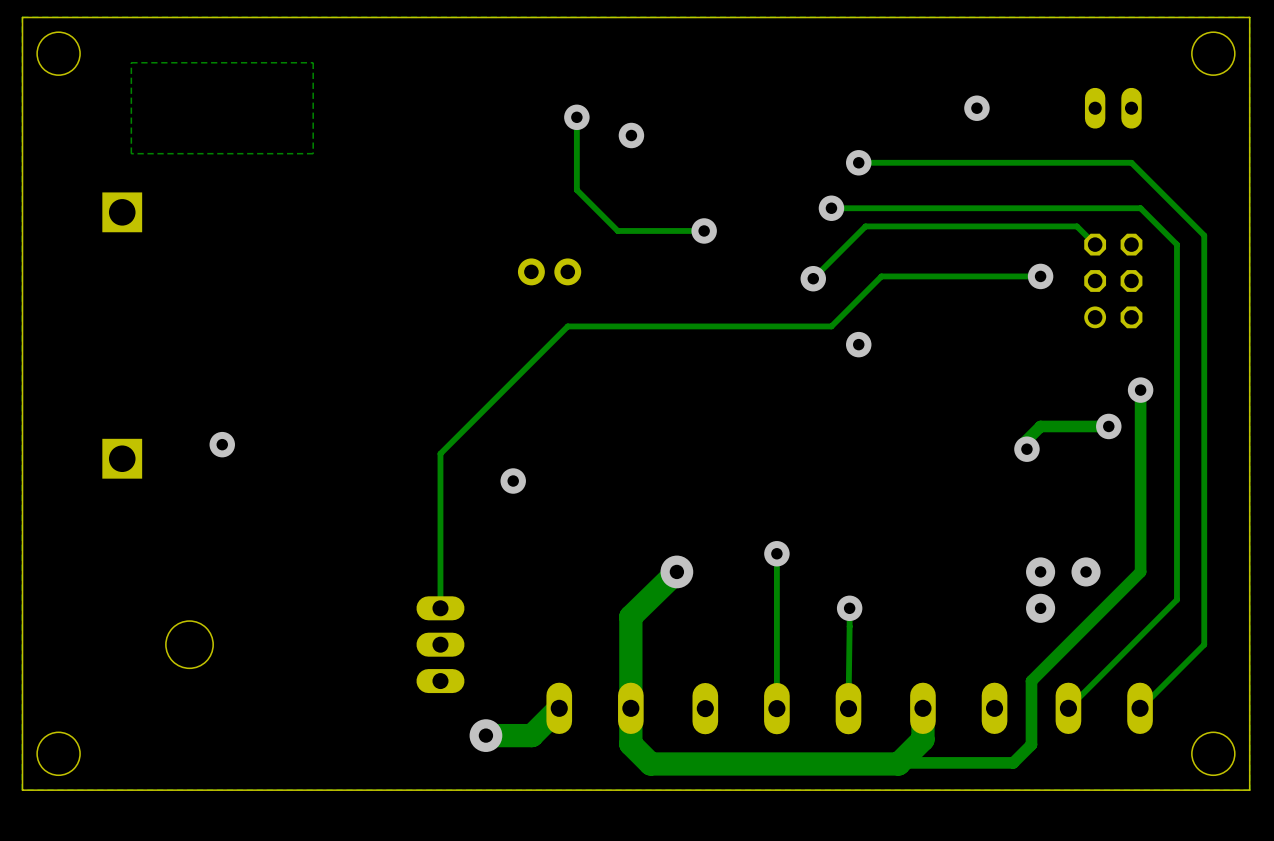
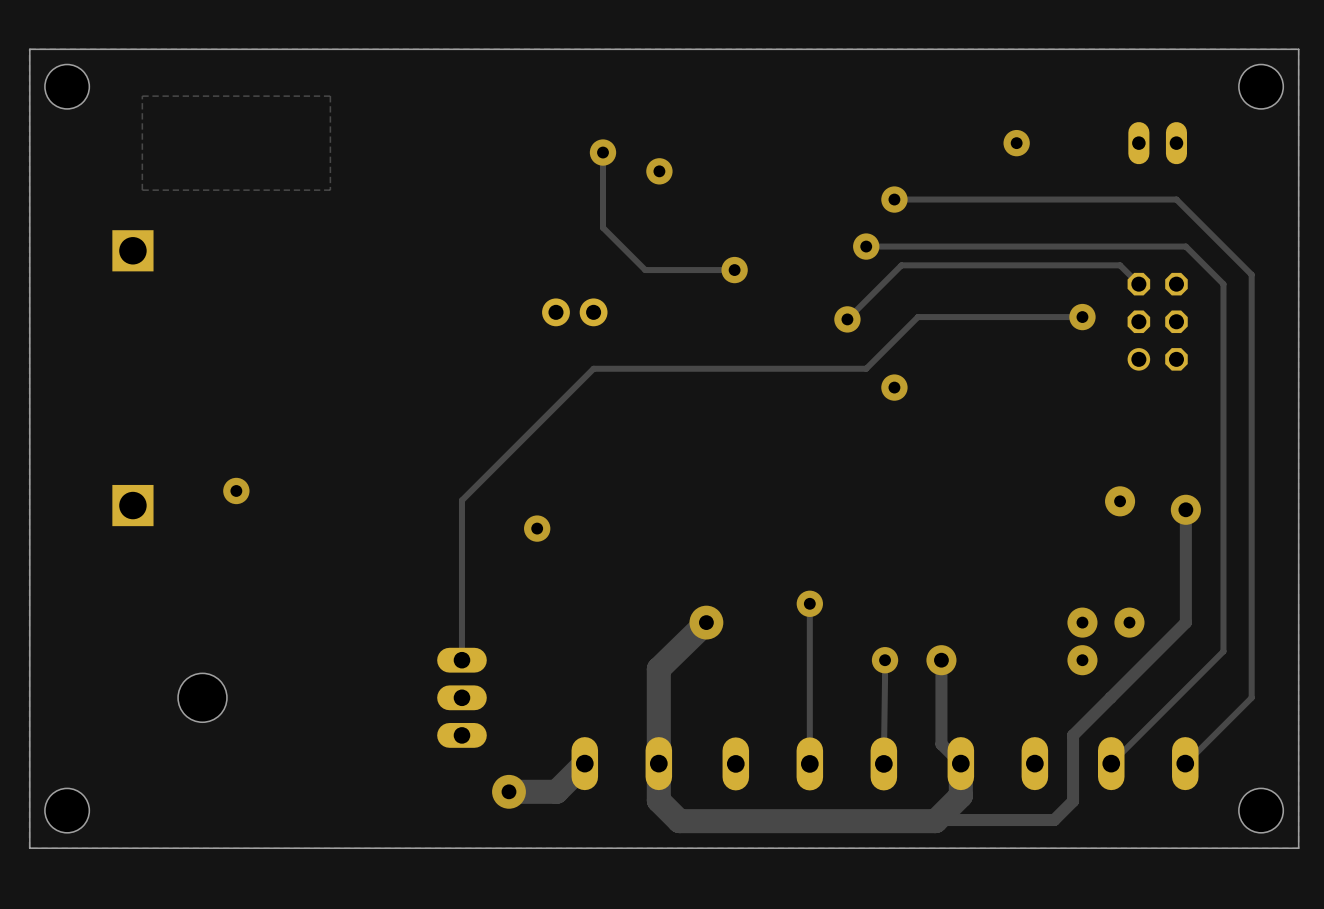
track: (1140, 390) (1140, 462) -> none
via: (1140, 390) -> none
track: (1108, 426) (1040, 426) (1022, 444) (1026, 449) -> none
via: (1108, 426) -> none
via: (1026, 449) -> none
via: none -> (1120, 501)
via: none -> (1185, 509)
track: none -> (941, 660) (941, 744) (960, 763)
via: none -> (941, 660)

